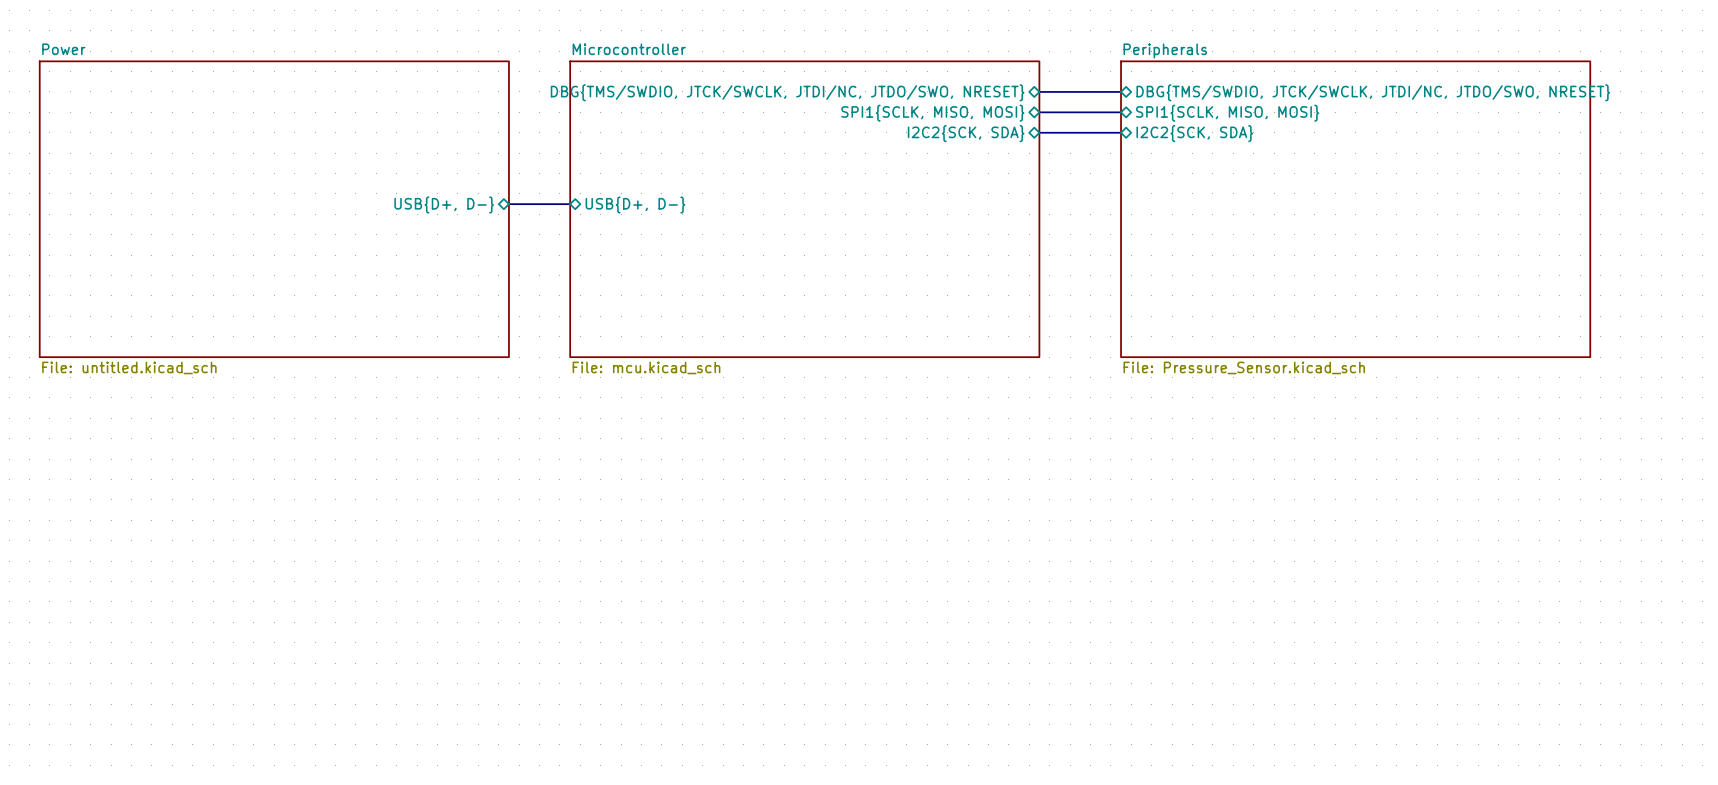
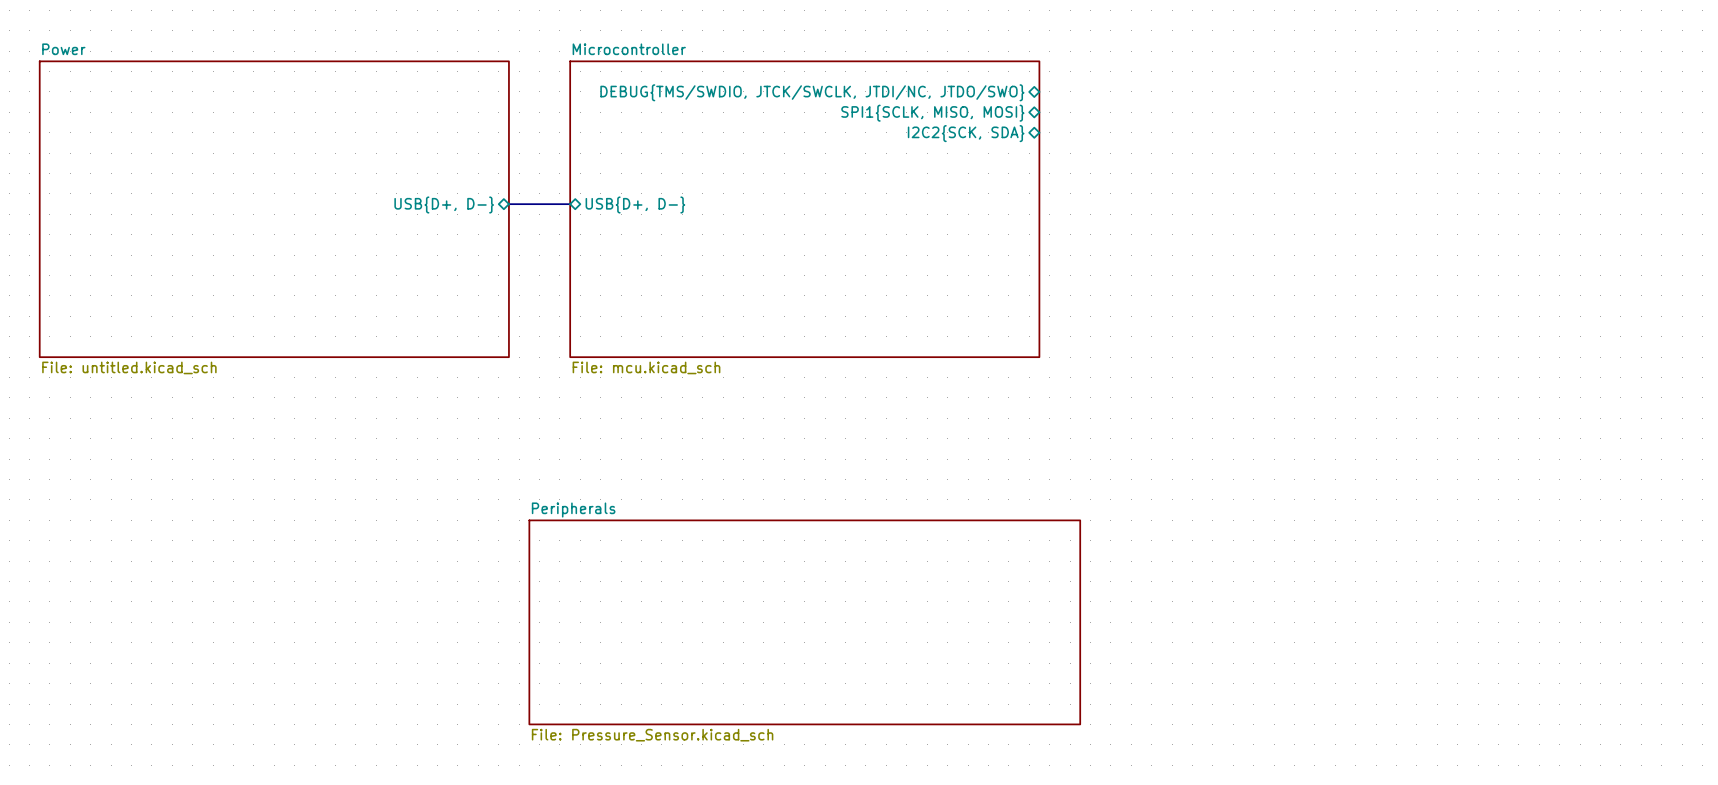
bus: (1039, 91) (1121, 91) -> none
sheet pin: DBG{TMS/SWDIO, JTCK/SWCLK, JTDI/NC, JTDO/SWO, NRESET} (787, 92) -> DEBUG{TMS/SWDIO, JTCK/SWCLK, JTDI/NC, JTDO/SWO} (812, 92)
sheet pin: DBG{TMS/SWDIO, JTCK/SWCLK, JTDI/NC, JTDO/SWO, NRESET} (1373, 92) -> none
bus: (1039, 112) (1121, 112) -> none
sheet pin: SPI1{SCLK, MISO, MOSI} (1227, 113) -> none
bus: (1039, 132) (1121, 132) -> none
sheet pin: I2C2{SCK, SDA} (1194, 133) -> none
sheet Peripherals: File: Pressure_Sensor.kicad_sch (1355, 209) -> none
sheet Peripherals: none -> File: Pressure_Sensor.kicad_sch (804, 622)

